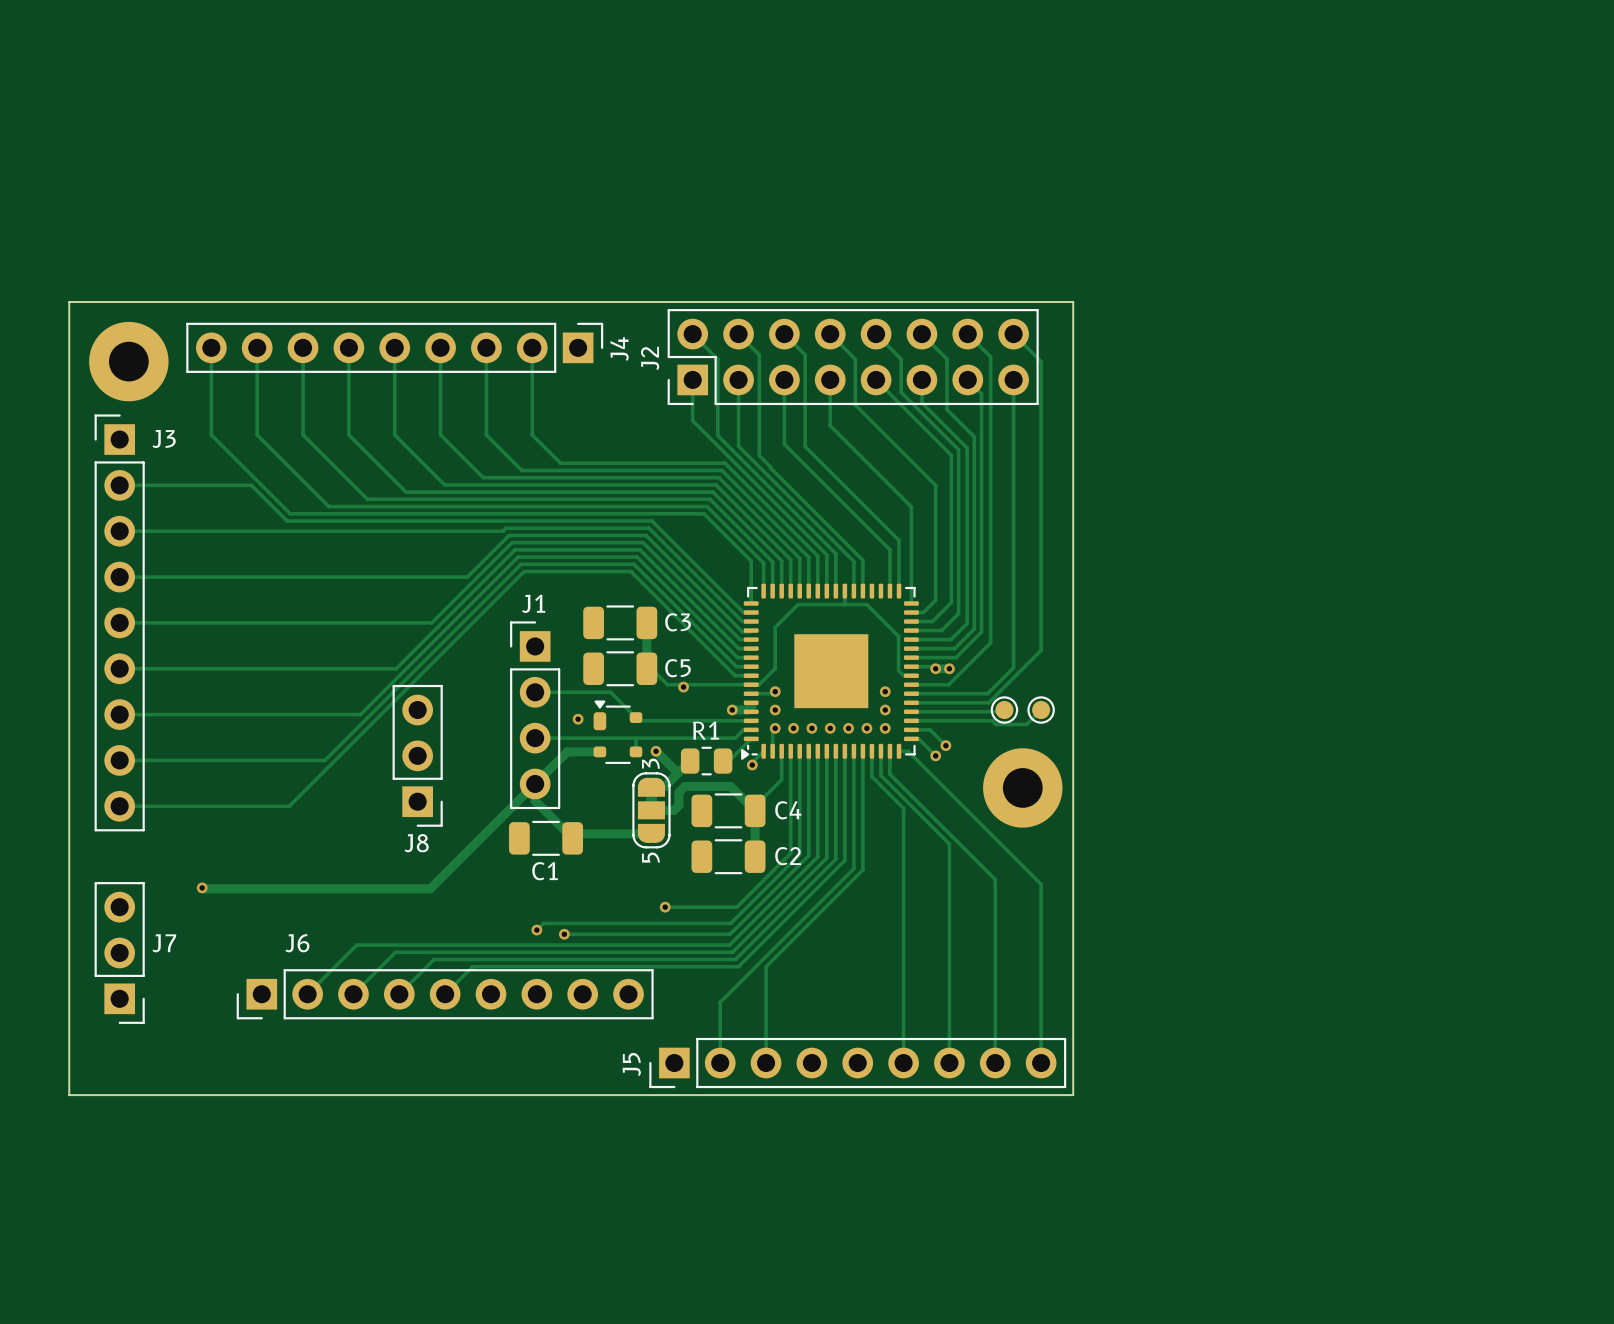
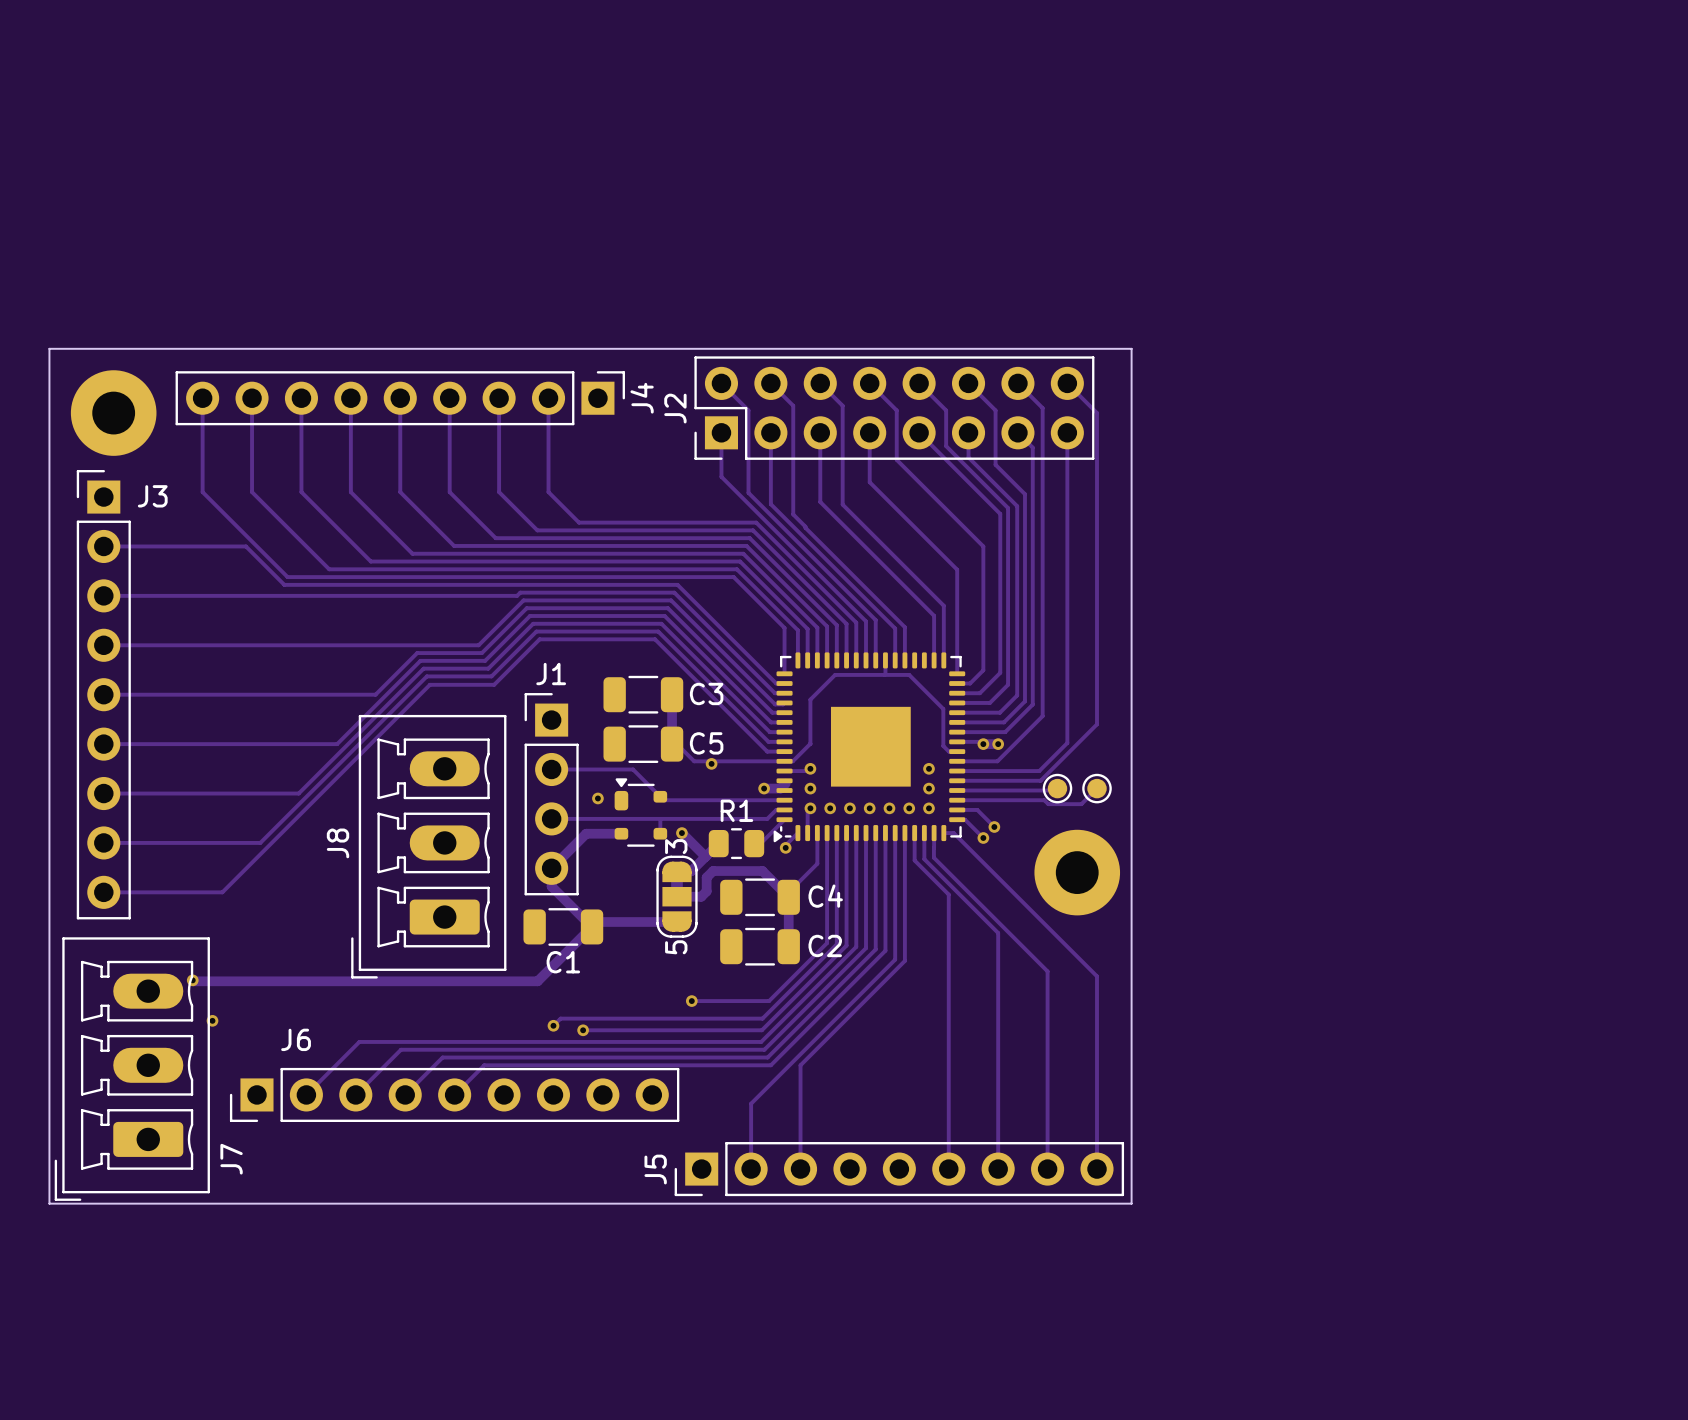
track: (470, 584) (431, 622) (371, 622) -> (481, 653) (417, 653) (375, 694)
track: (473, 591) (396, 668) (336, 668) -> (485, 660) (420, 660) (337, 744)
track: (476, 598) (360, 714) (300, 714) -> (488, 668) (423, 668) (298, 793)
track: (479, 605) (324, 760) (264, 760) -> (491, 676) (426, 676) (260, 842)
track: (481, 613) (289, 806) (229, 806) -> (494, 684) (429, 684) (222, 892)
J8 footprint: [392, 684, 443, 827] -> [351, 714, 507, 979]
track: (535, 783) (430, 888) -> (592, 926) (537, 981) (438, 981)
J8 name position: J8 (416, 843) -> J8 (338, 843)
J7 footprint: [94, 882, 145, 1024] -> [54, 937, 210, 1201]
via: none -> (212, 1020)
J7 name position: J7 (164, 943) -> J7 (231, 1159)

